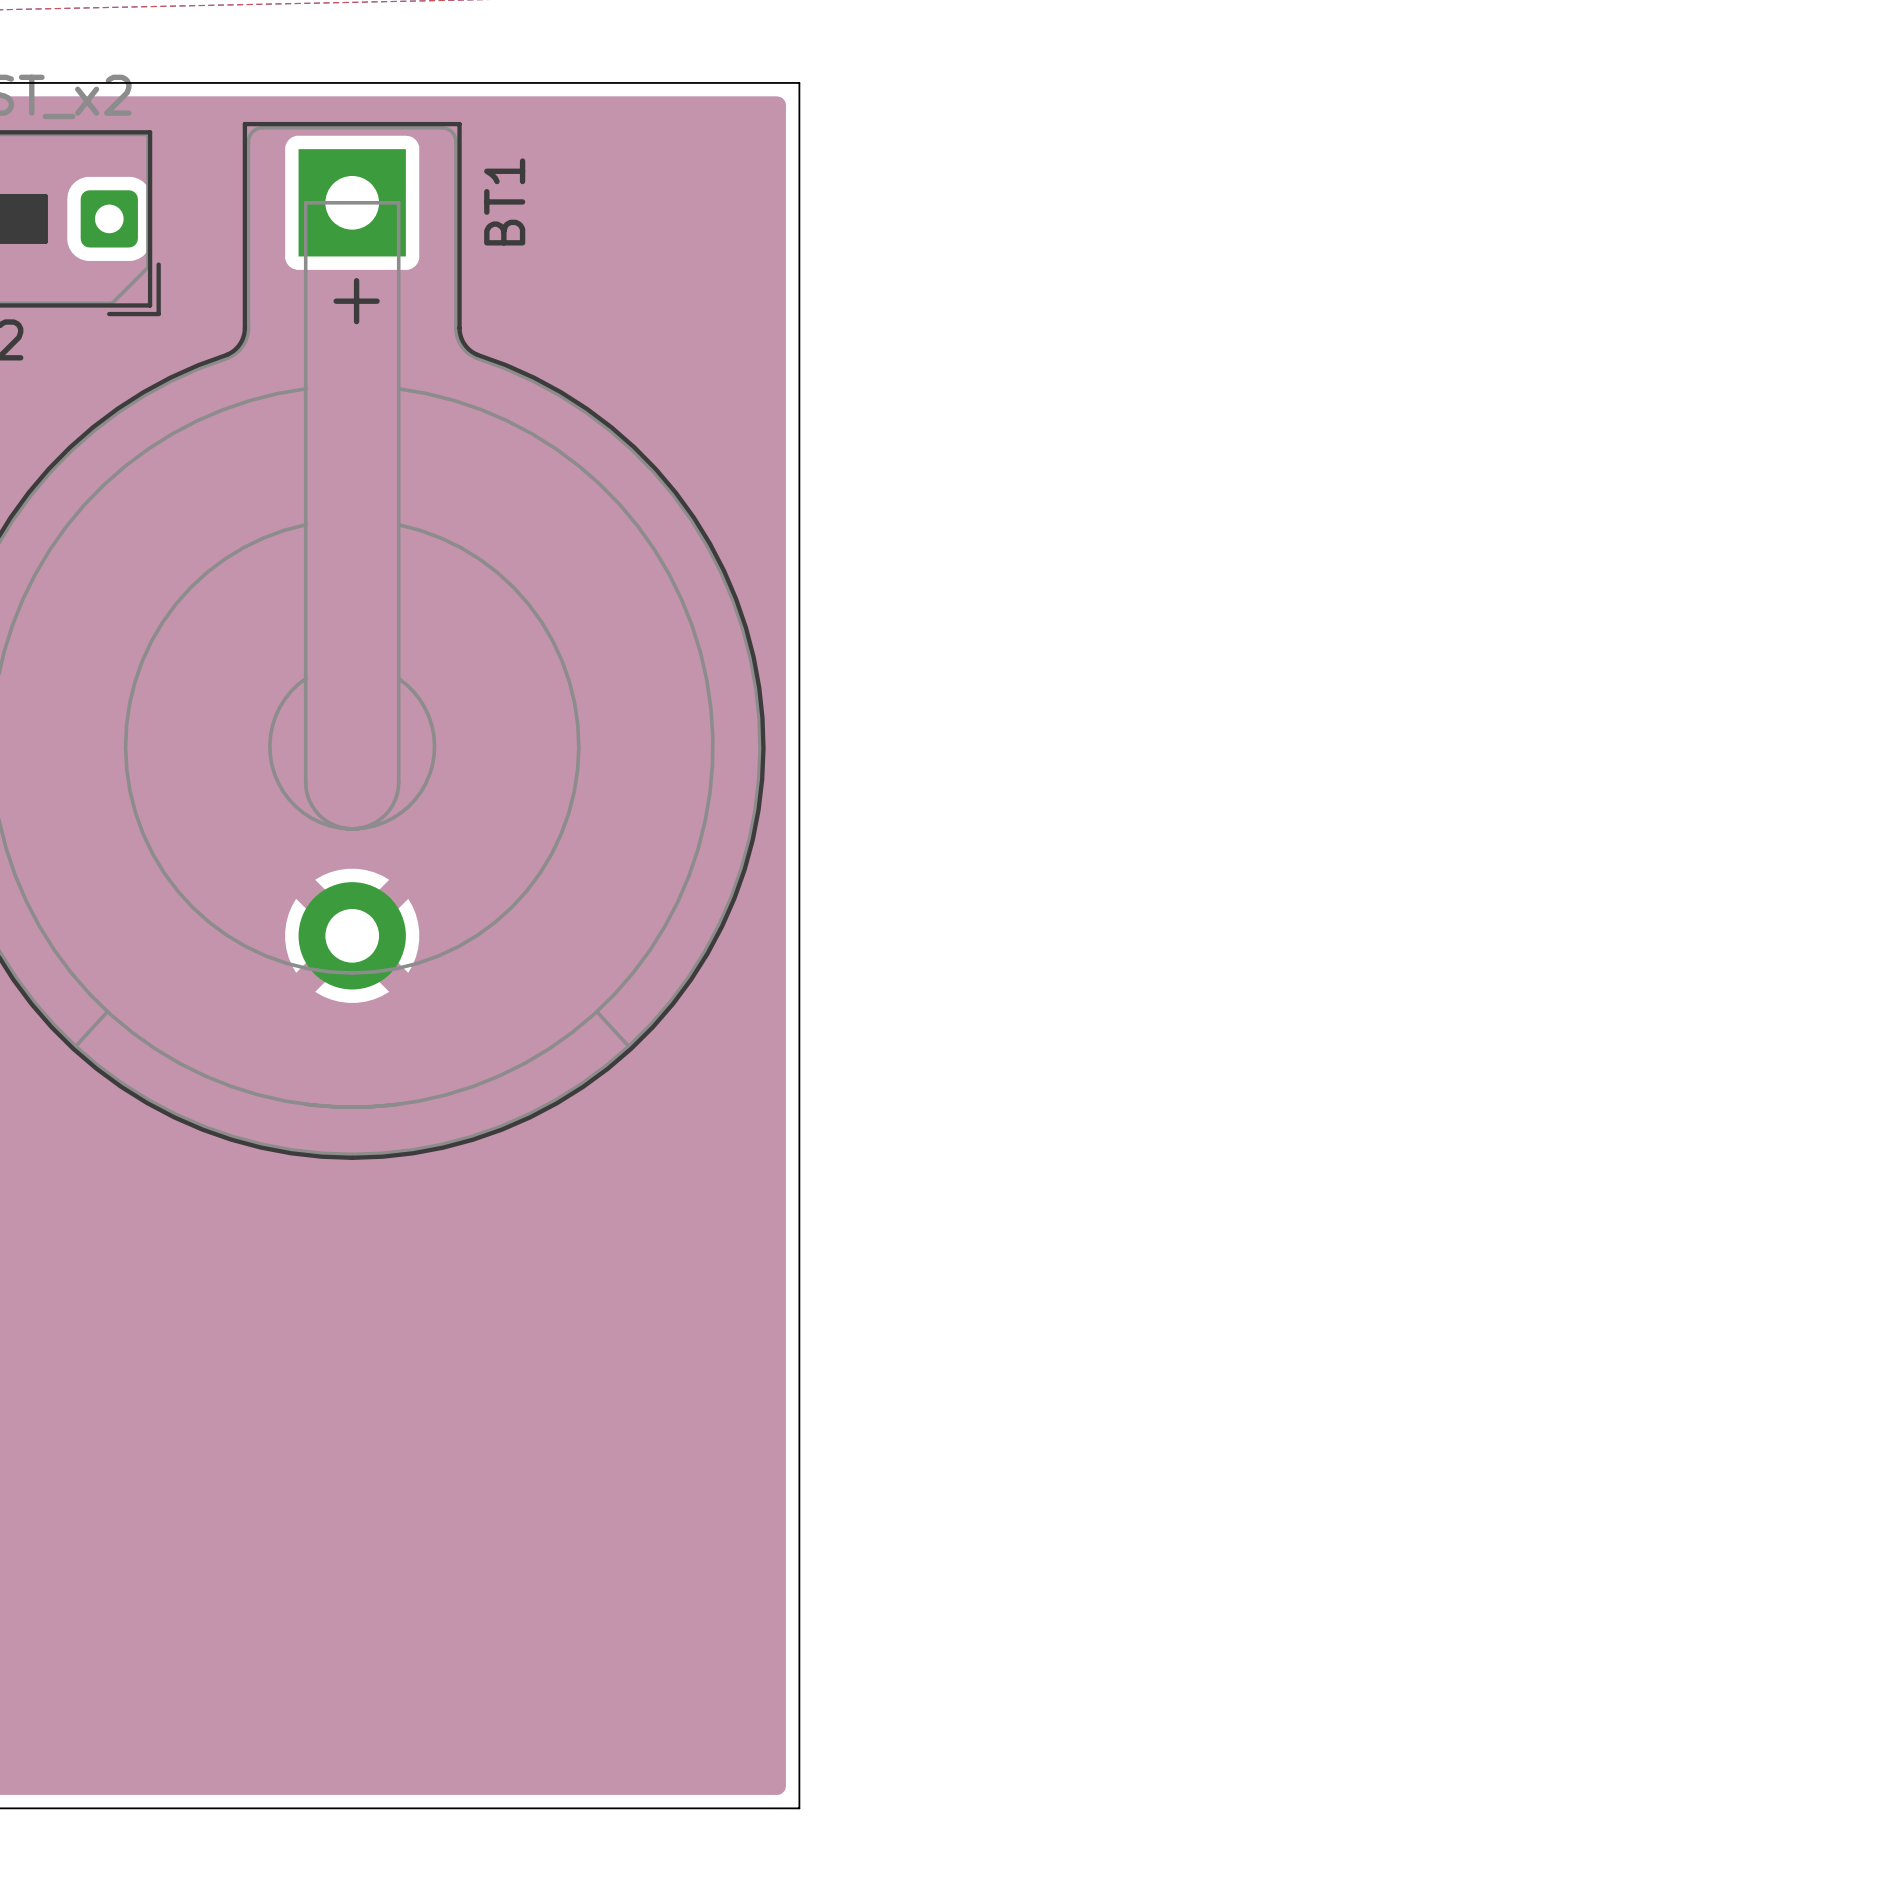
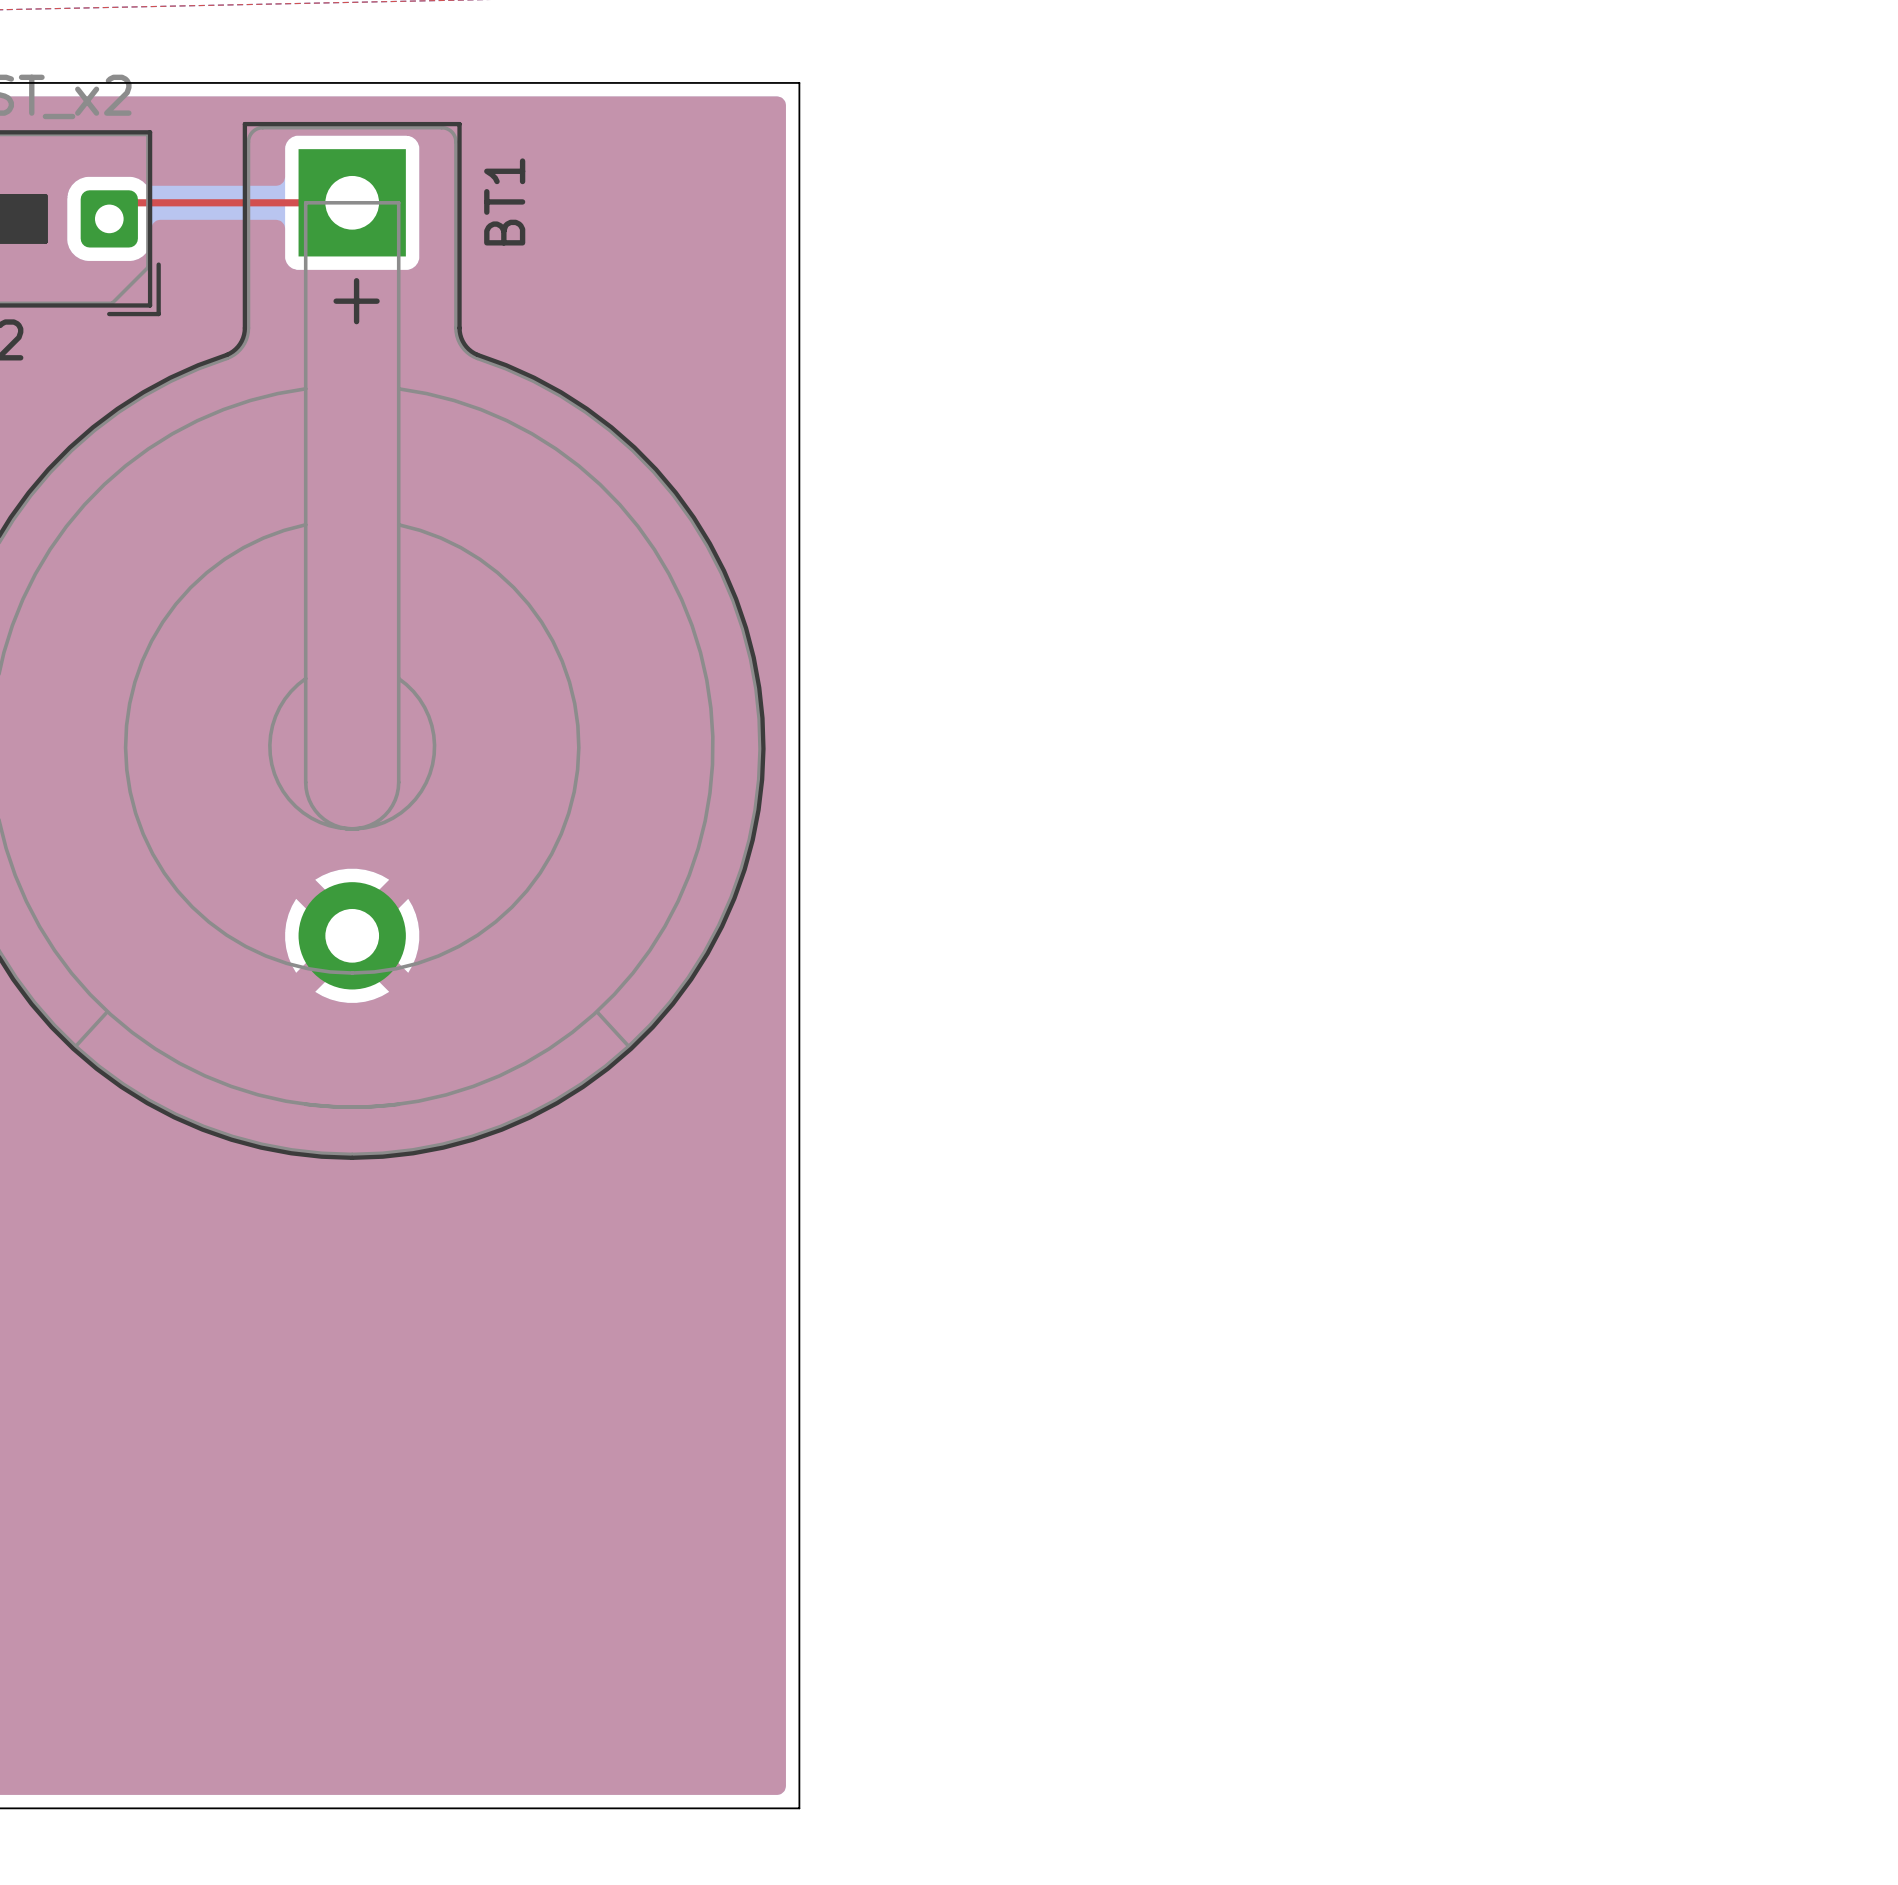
top track: none -> (352, 202) (125, 202) (109, 218)

